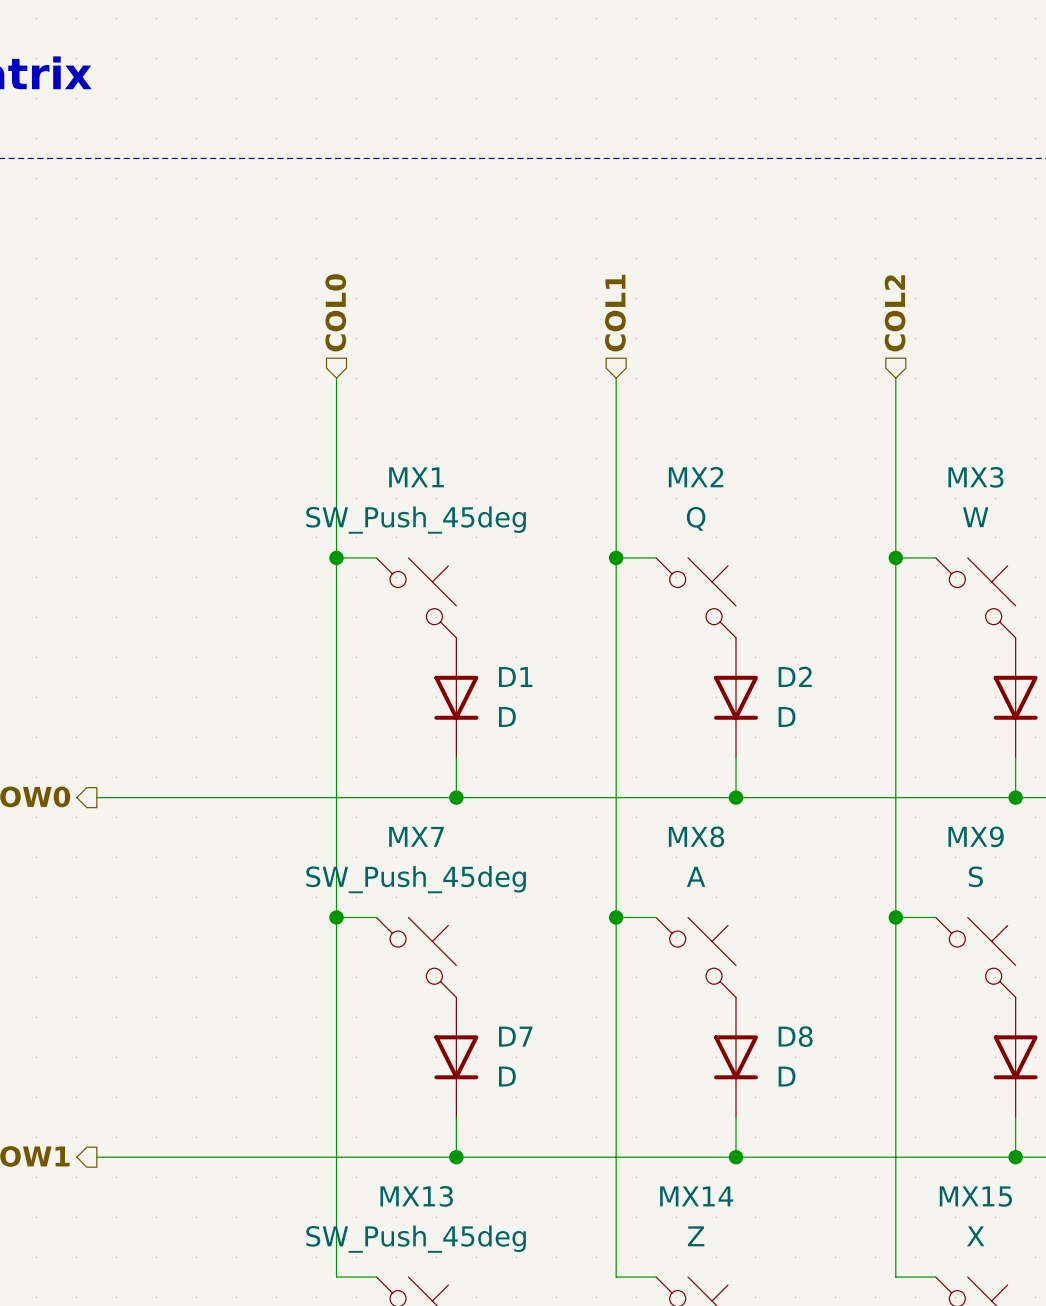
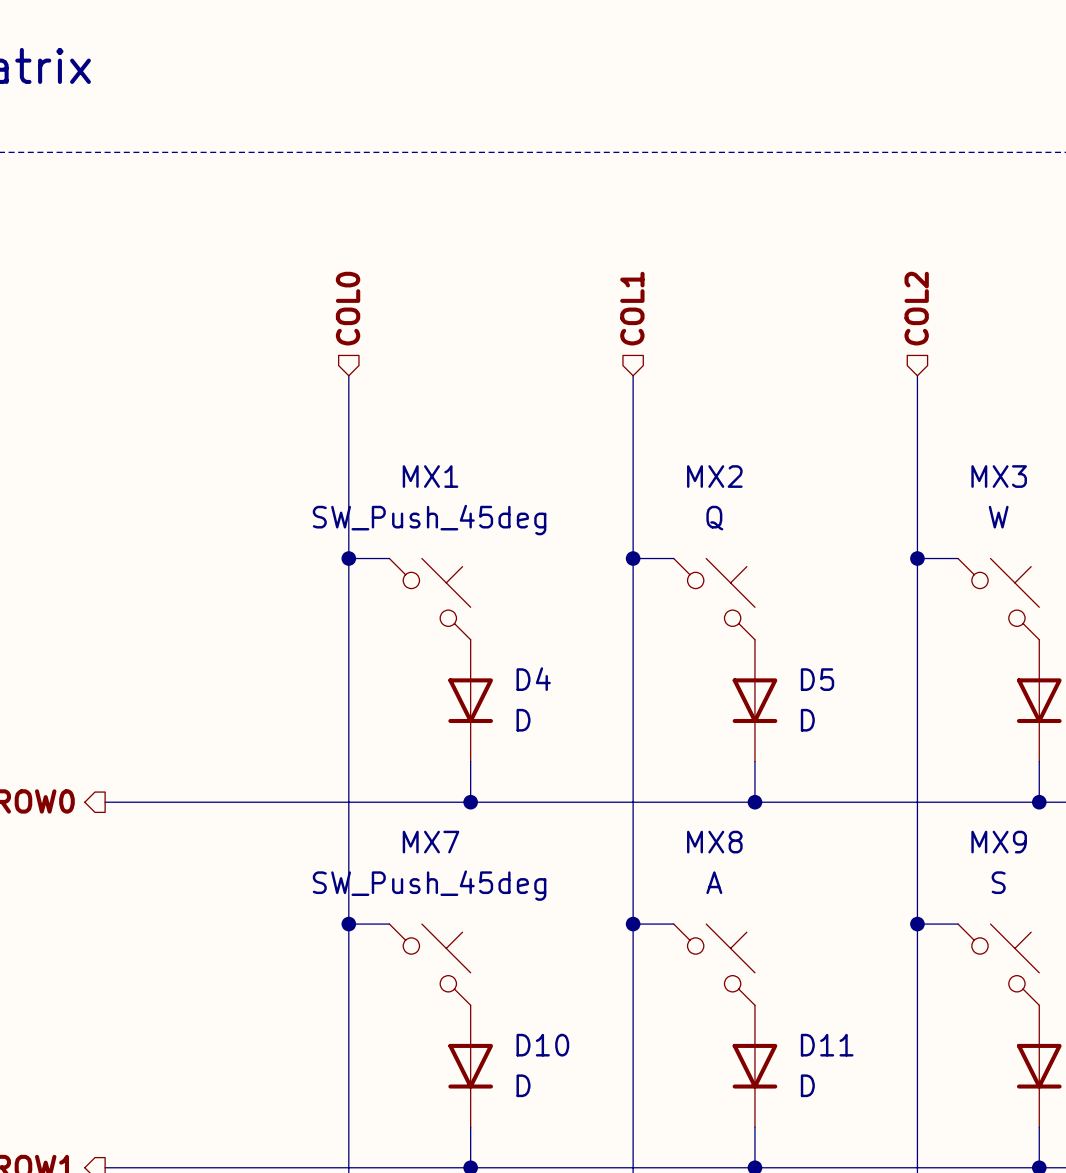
D2 name: D2 (795, 676) -> D5 (817, 679)
D1 name: D1 (515, 677) -> D4 (533, 679)
D7 name: D7 (515, 1036) -> D10 (542, 1045)
D8 name: D8 (795, 1036) -> D11 (827, 1045)

